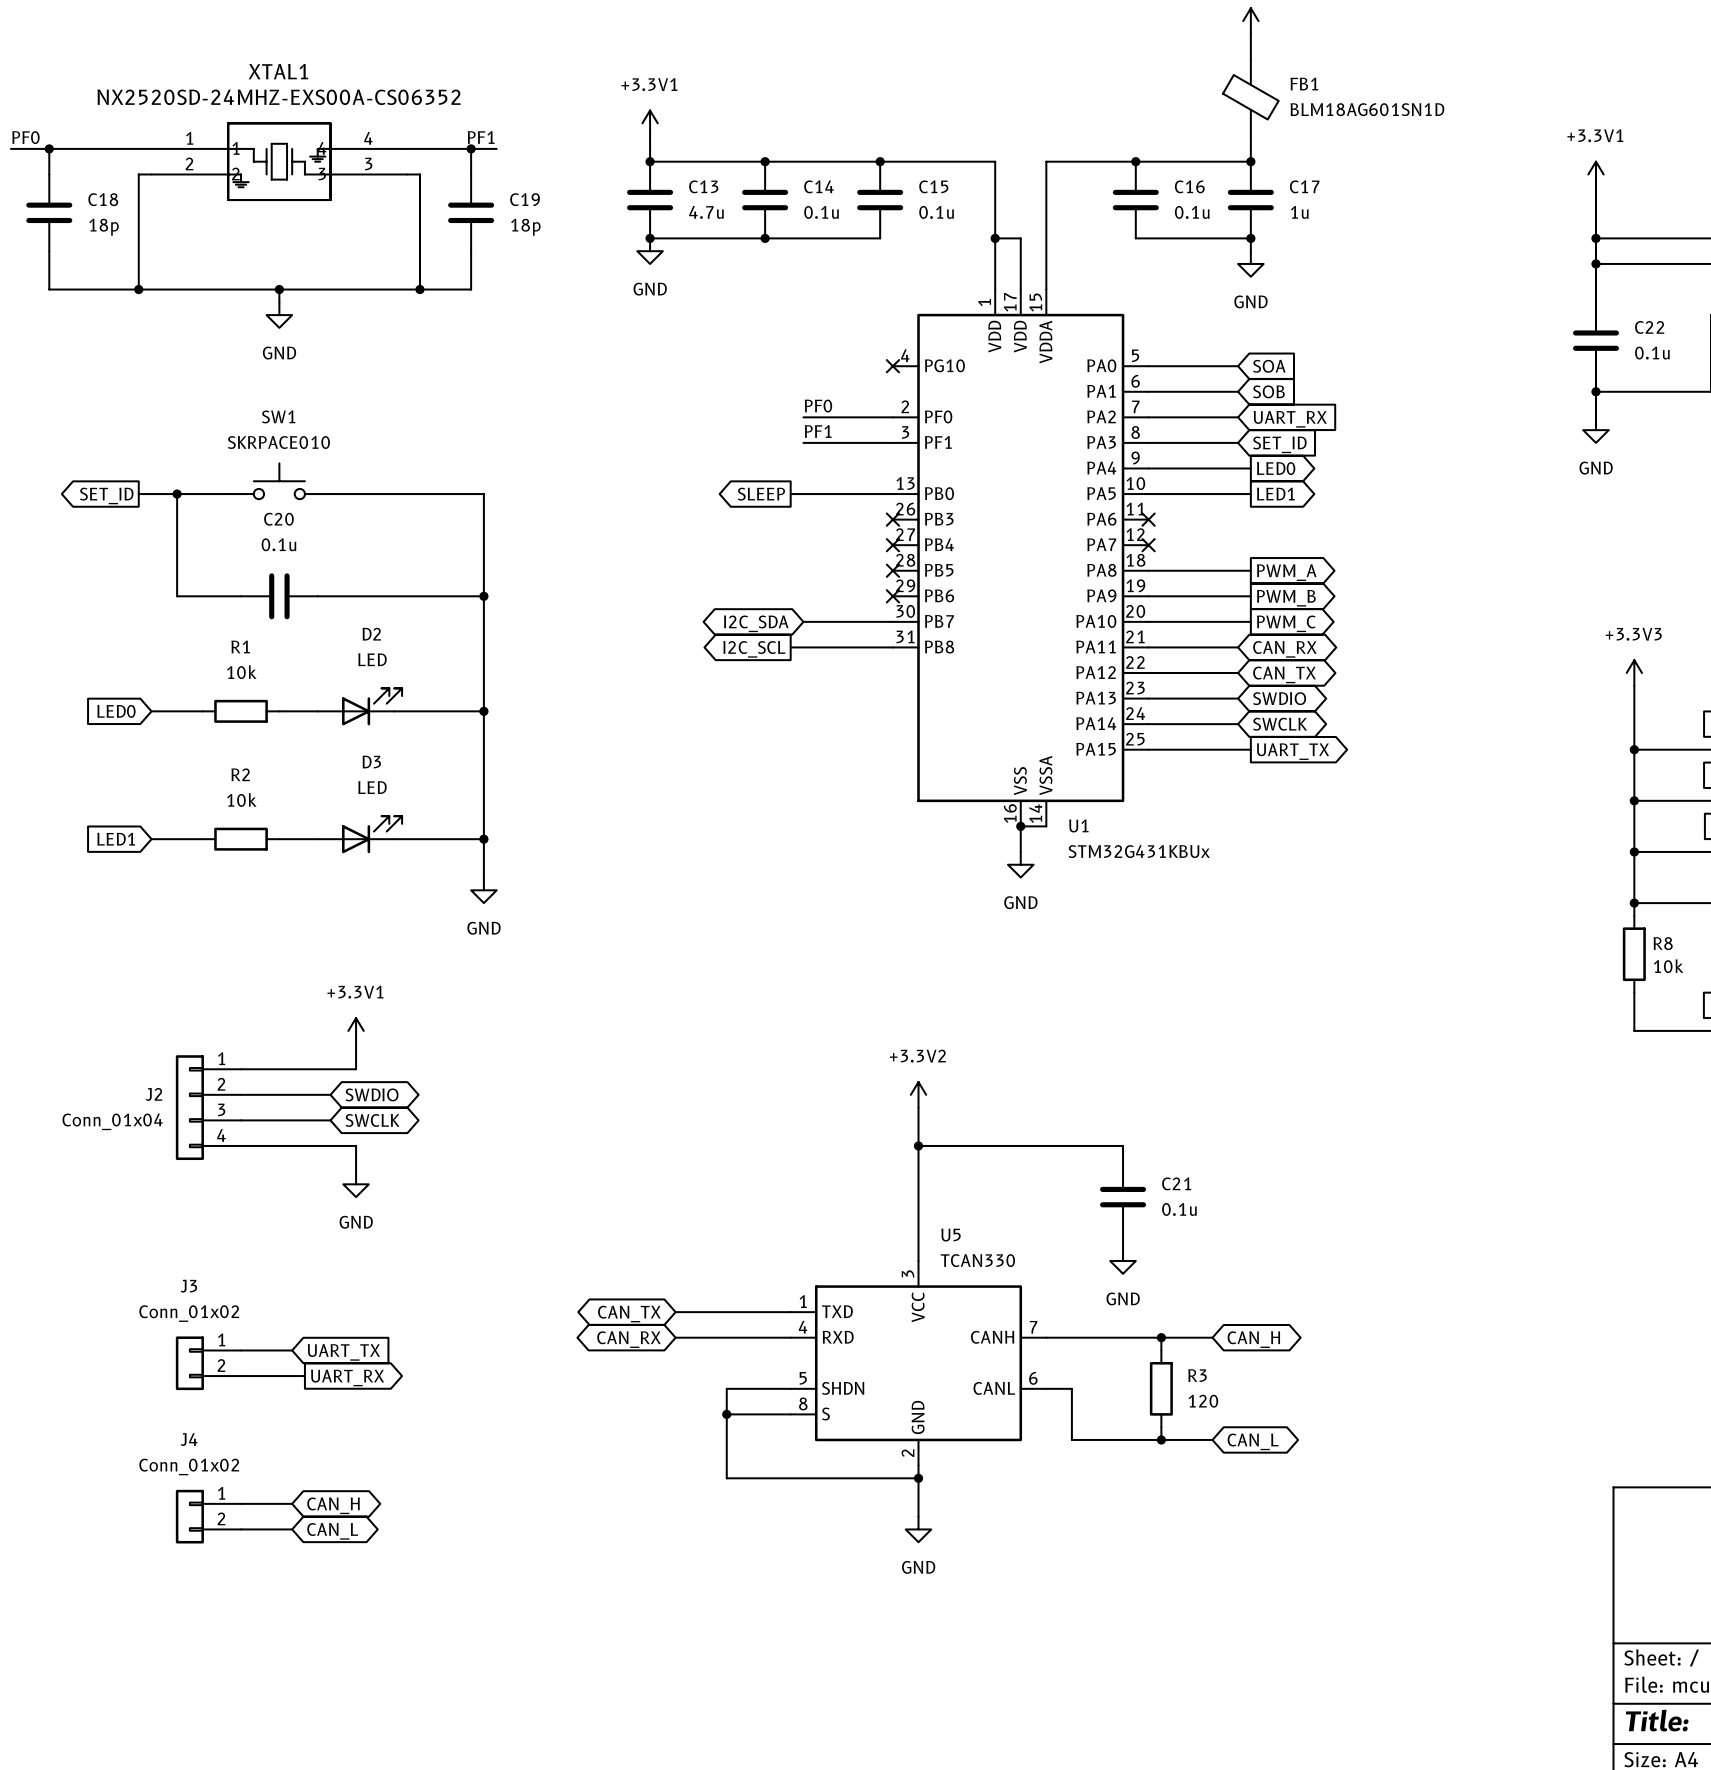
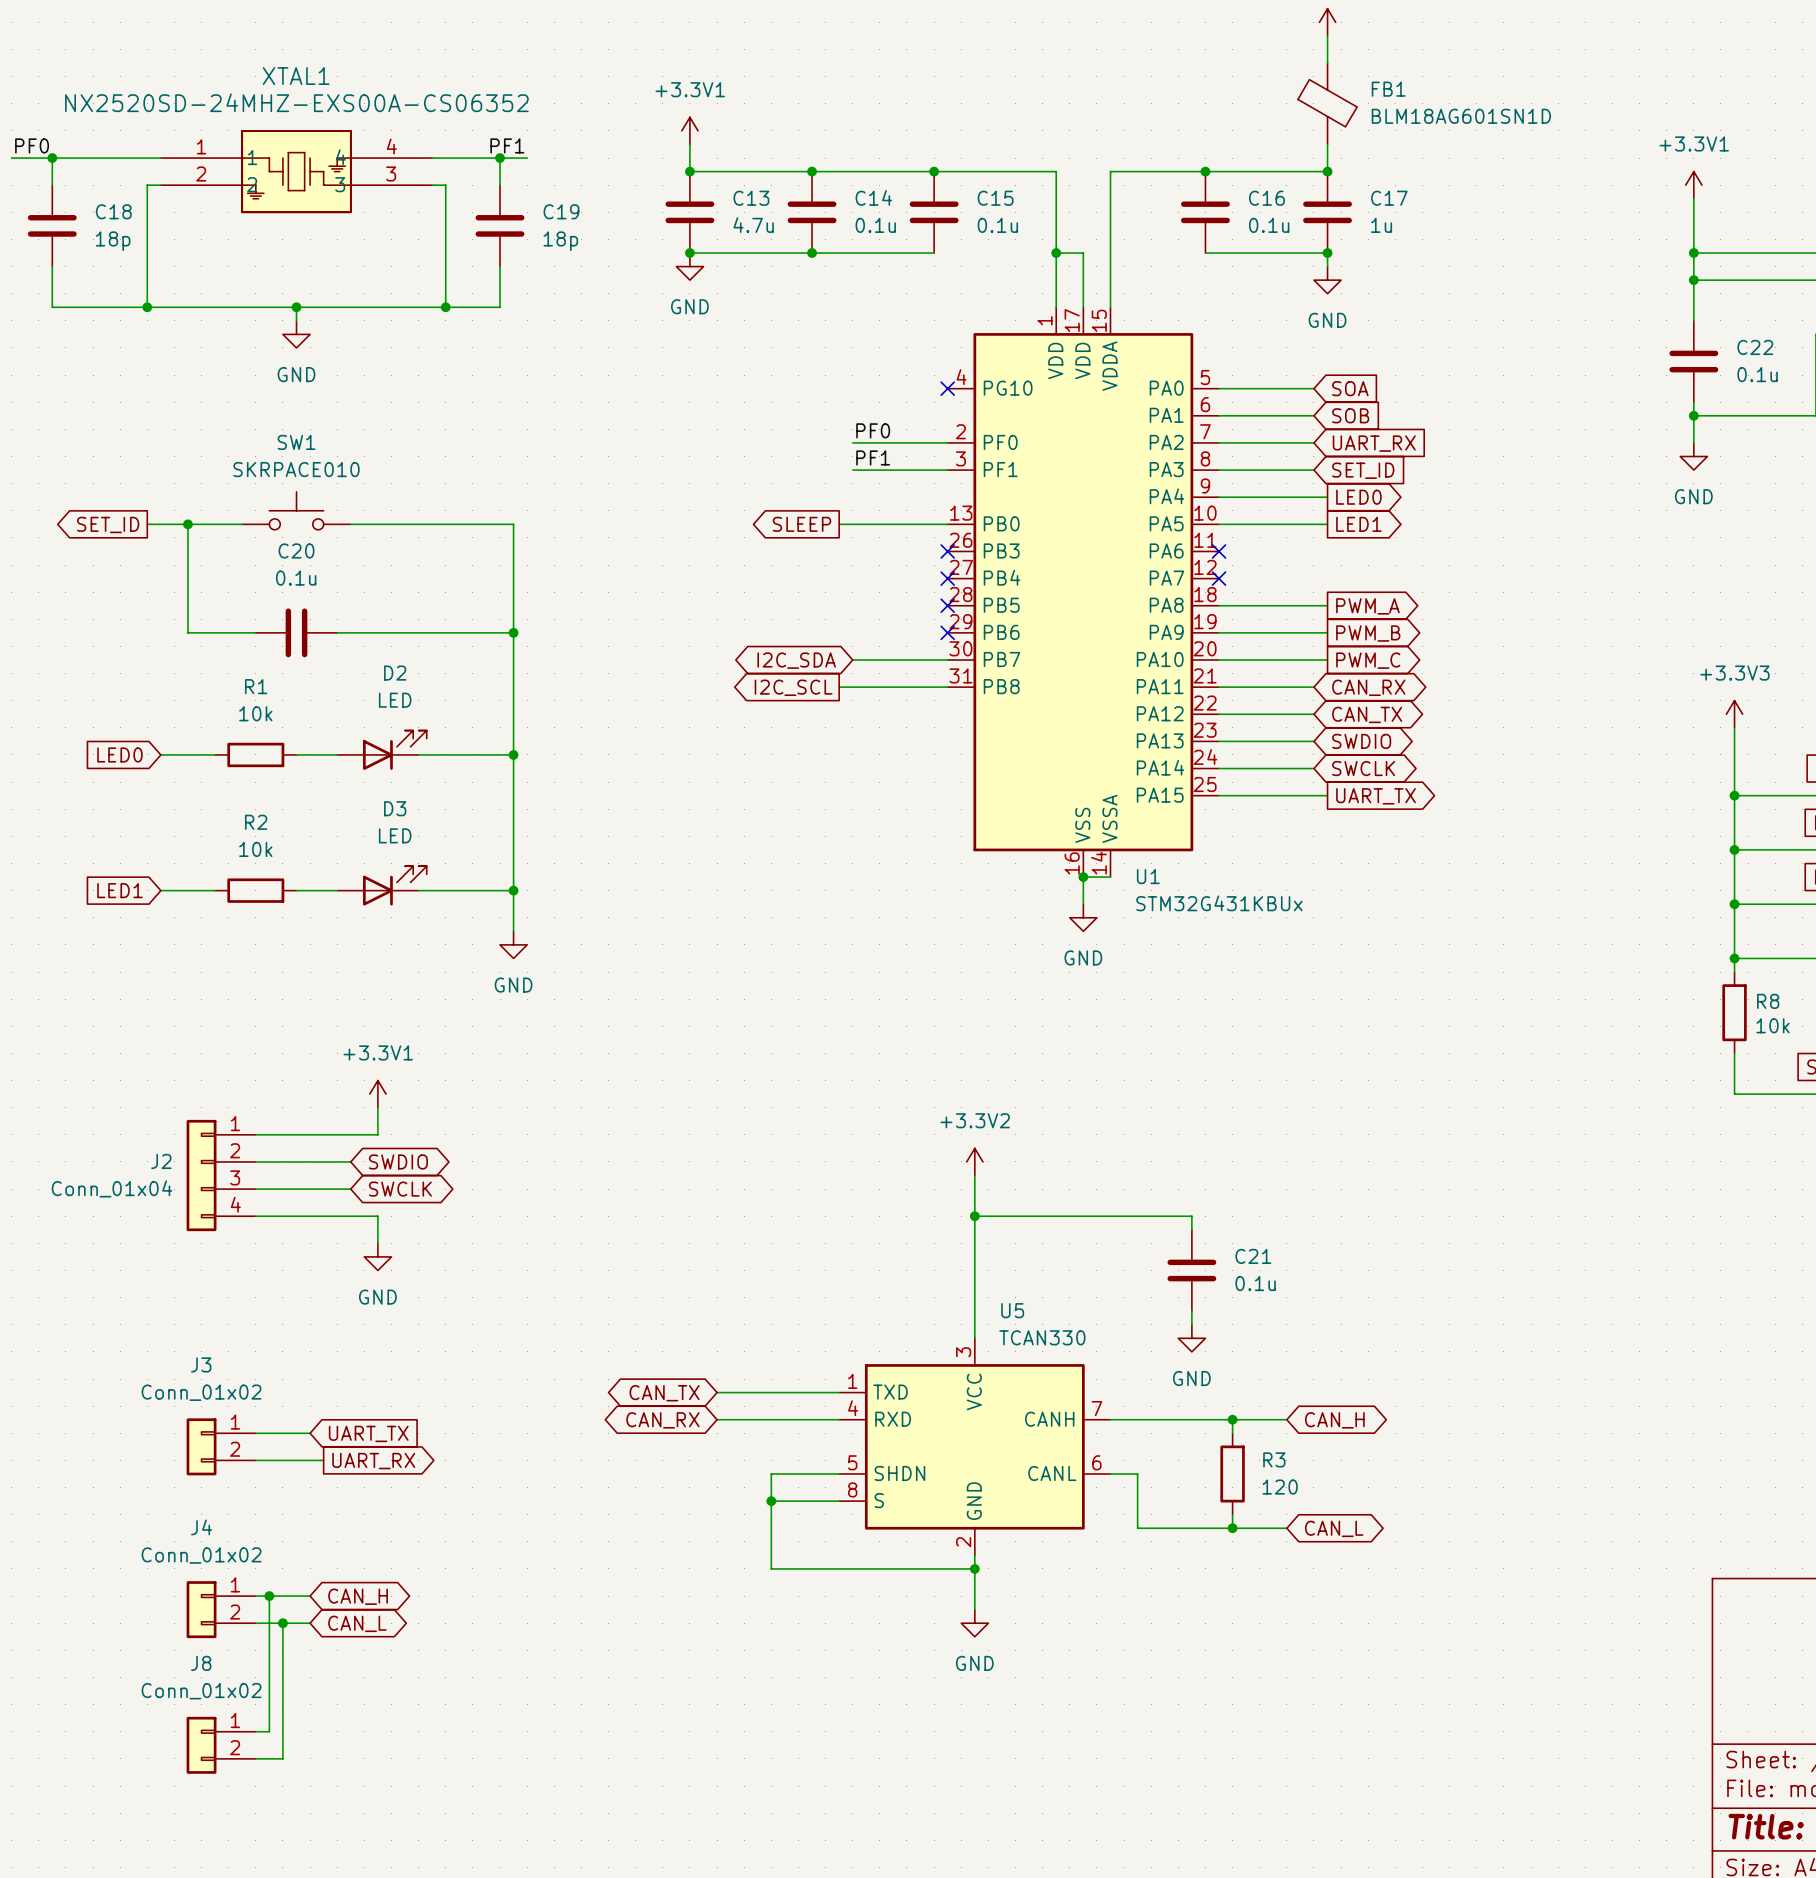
wire: none -> (269, 1596) (269, 1731) (255, 1731)
junction: none -> (269, 1596)
wire: none -> (282, 1623) (282, 1758) (255, 1758)
junction: none -> (282, 1623)
J8: none -> Conn_01x02 (221, 1745)

